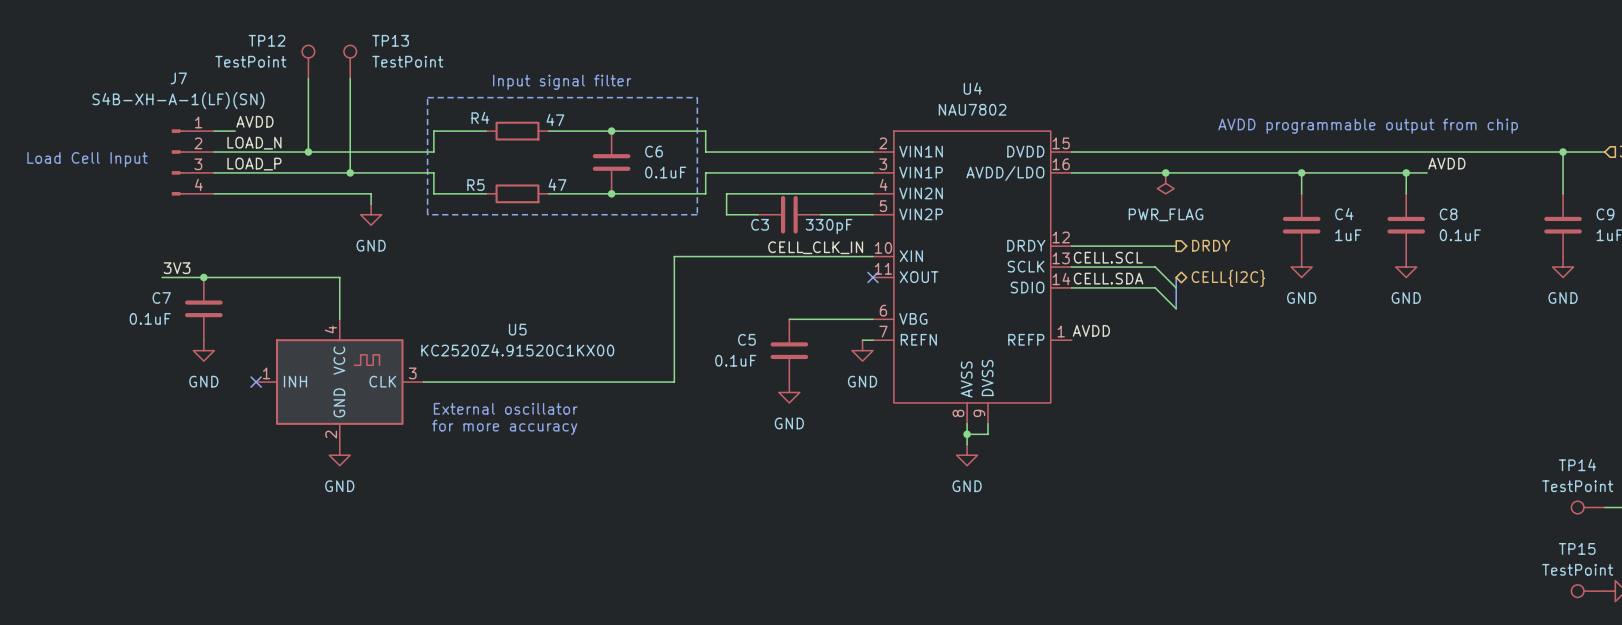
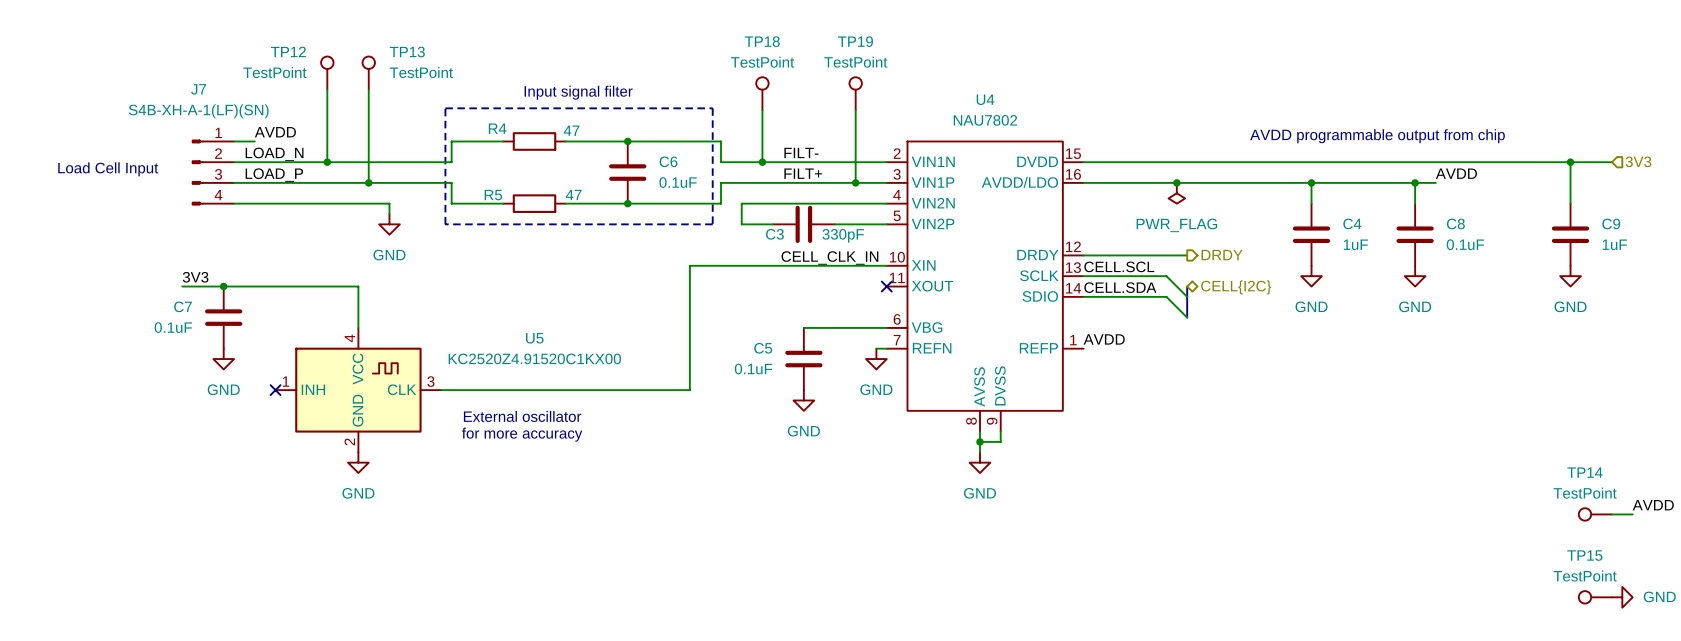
TP18: none -> TestPoint (762, 93)
TP19: none -> TestPoint (855, 93)
wire: none -> (762, 110) (762, 162)
wire: none -> (855, 110) (855, 182)
label: none -> FILT- (801, 152)
junction: none -> (762, 162)
label: none -> FILT+ (803, 173)
junction: none -> (855, 182)

